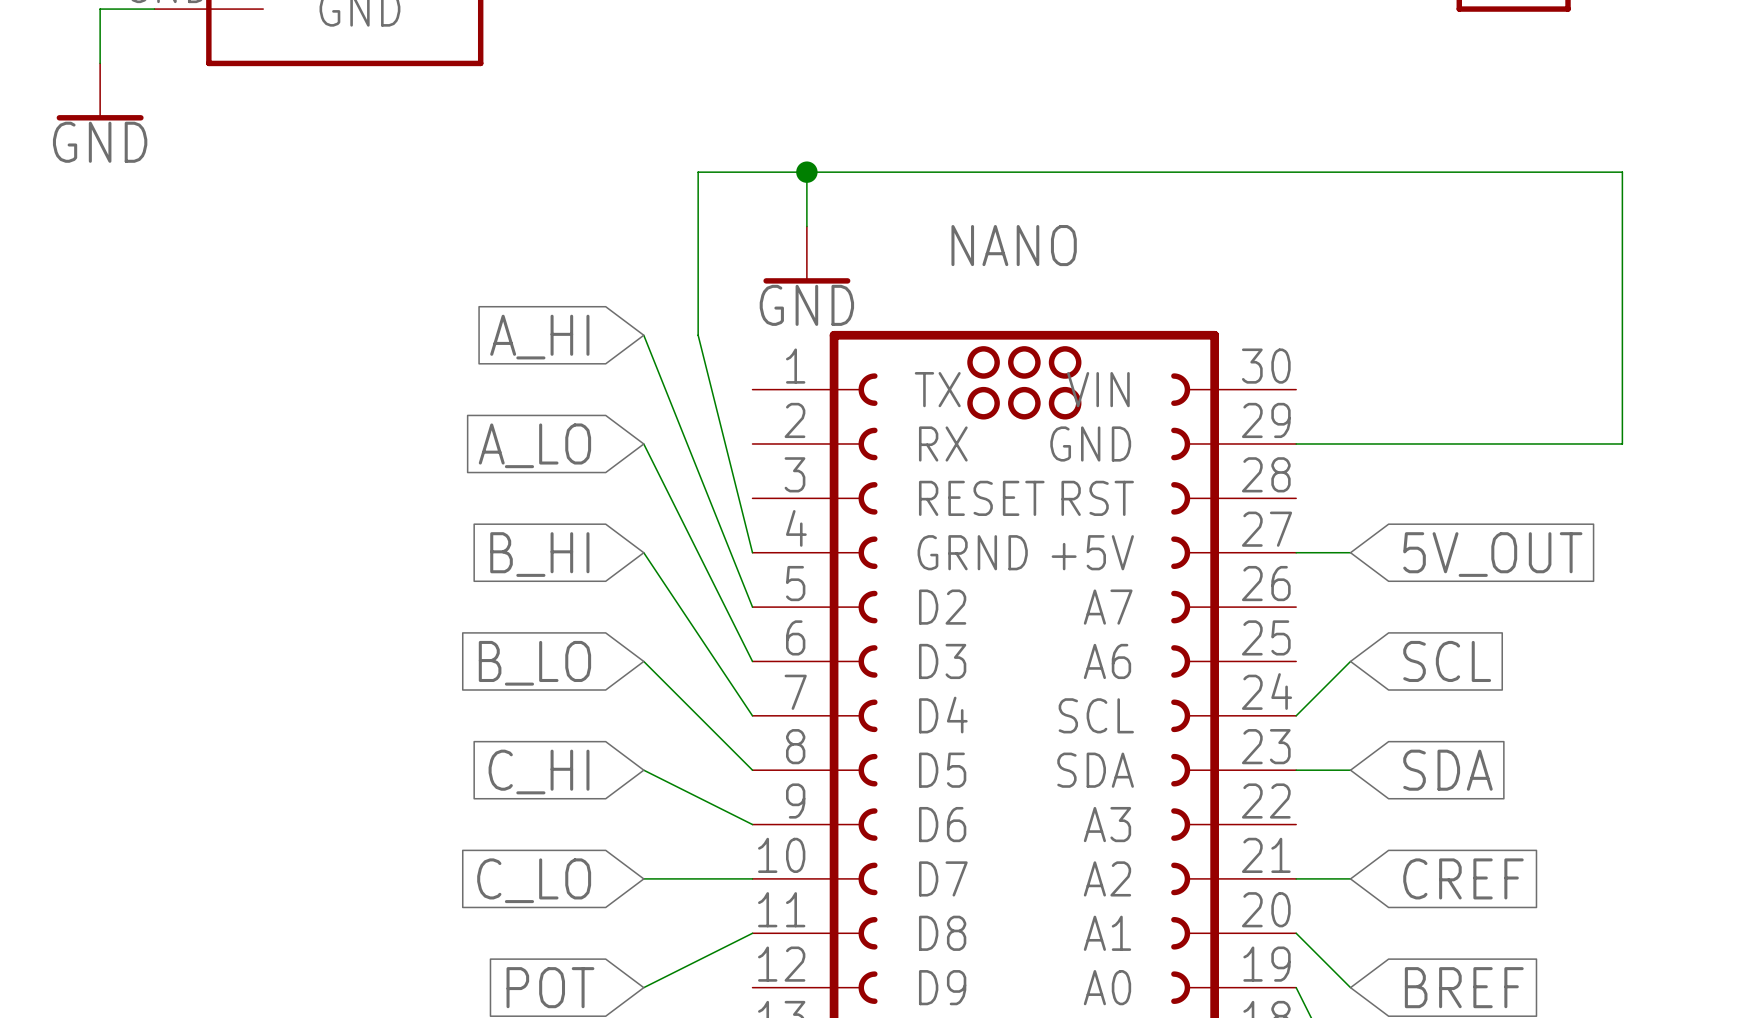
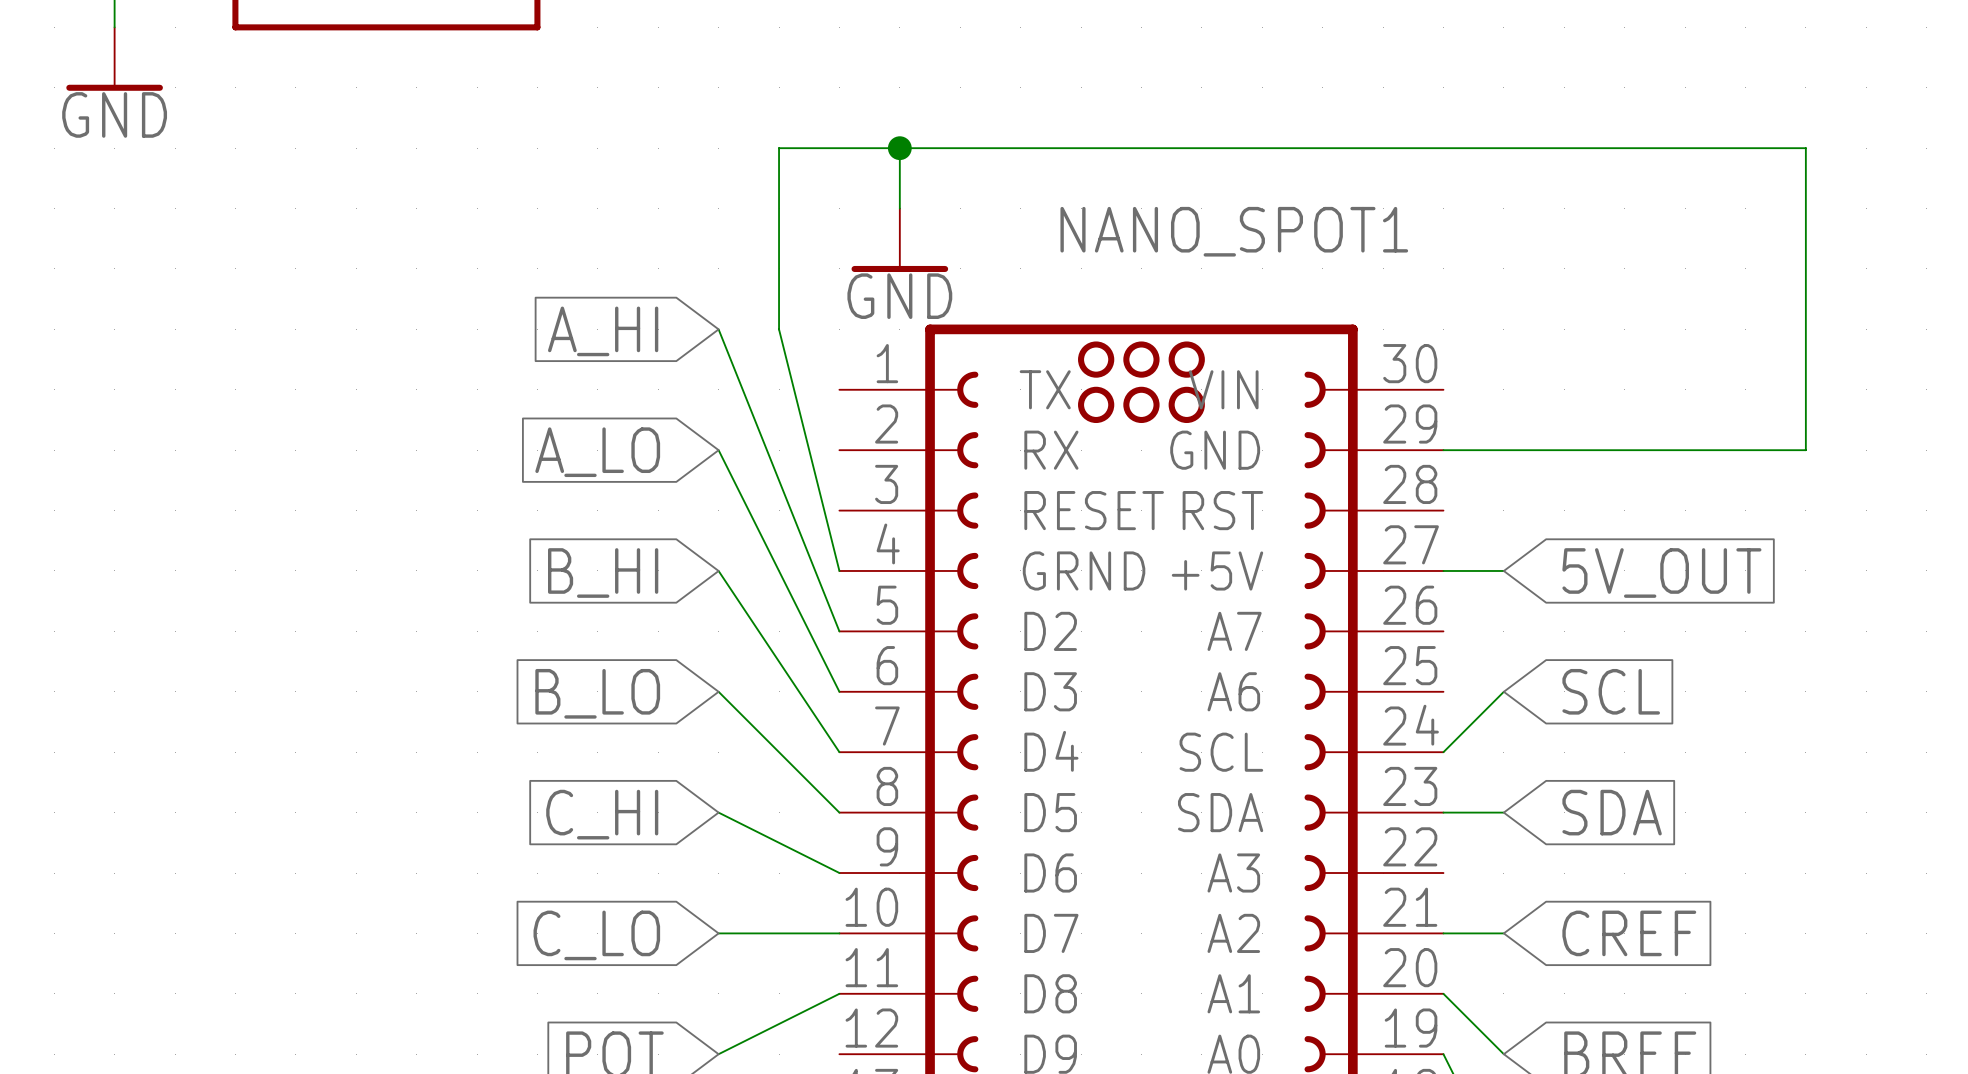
NANO name: NANO (1014, 245) -> NANO_SPOT1 (1234, 231)

